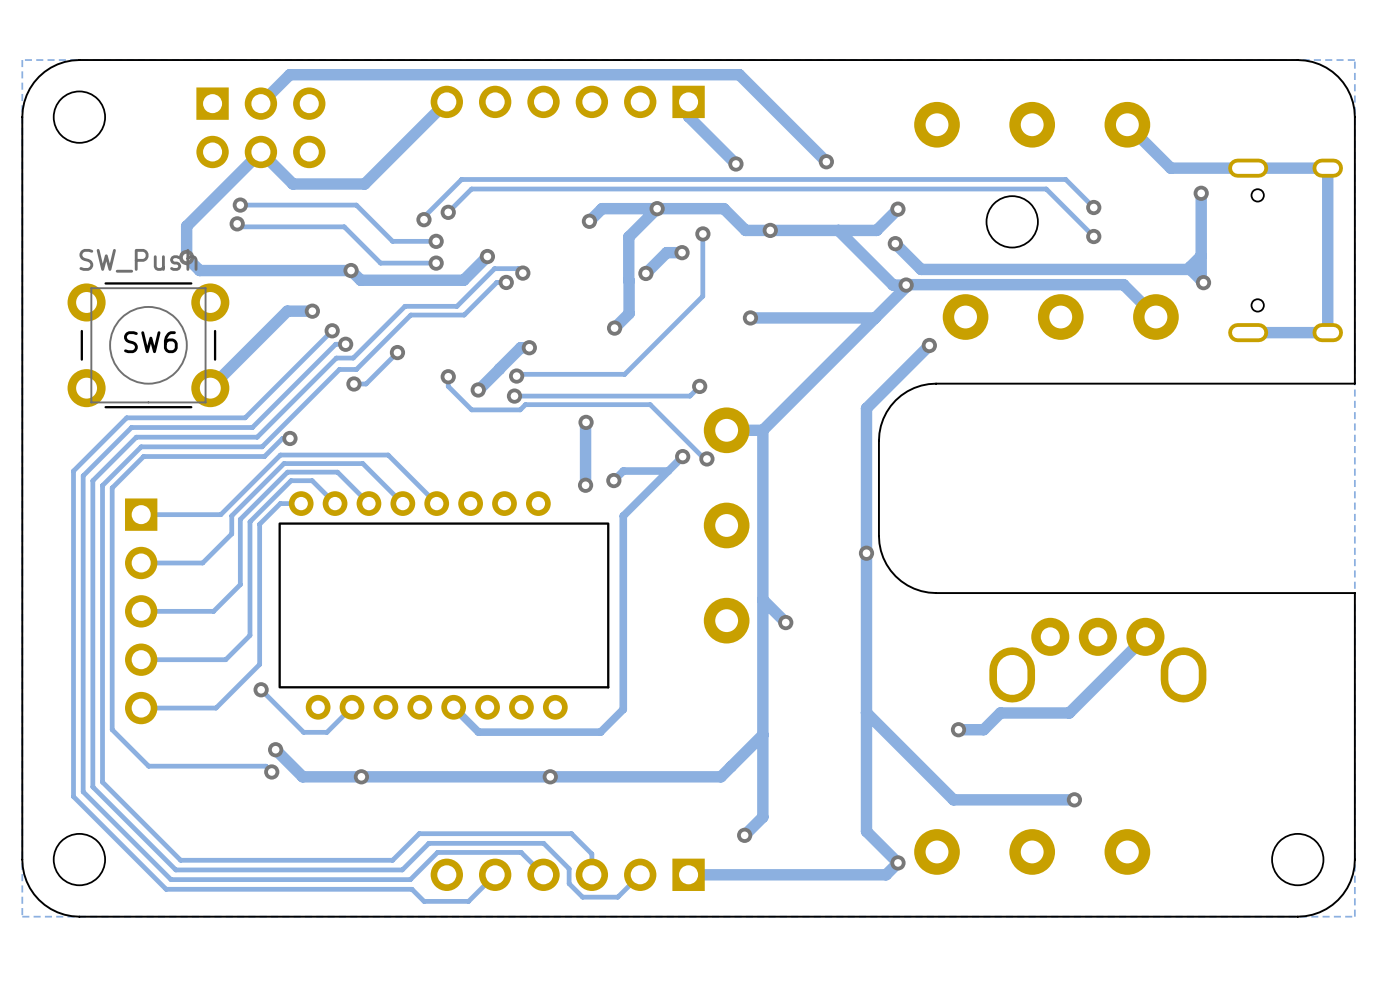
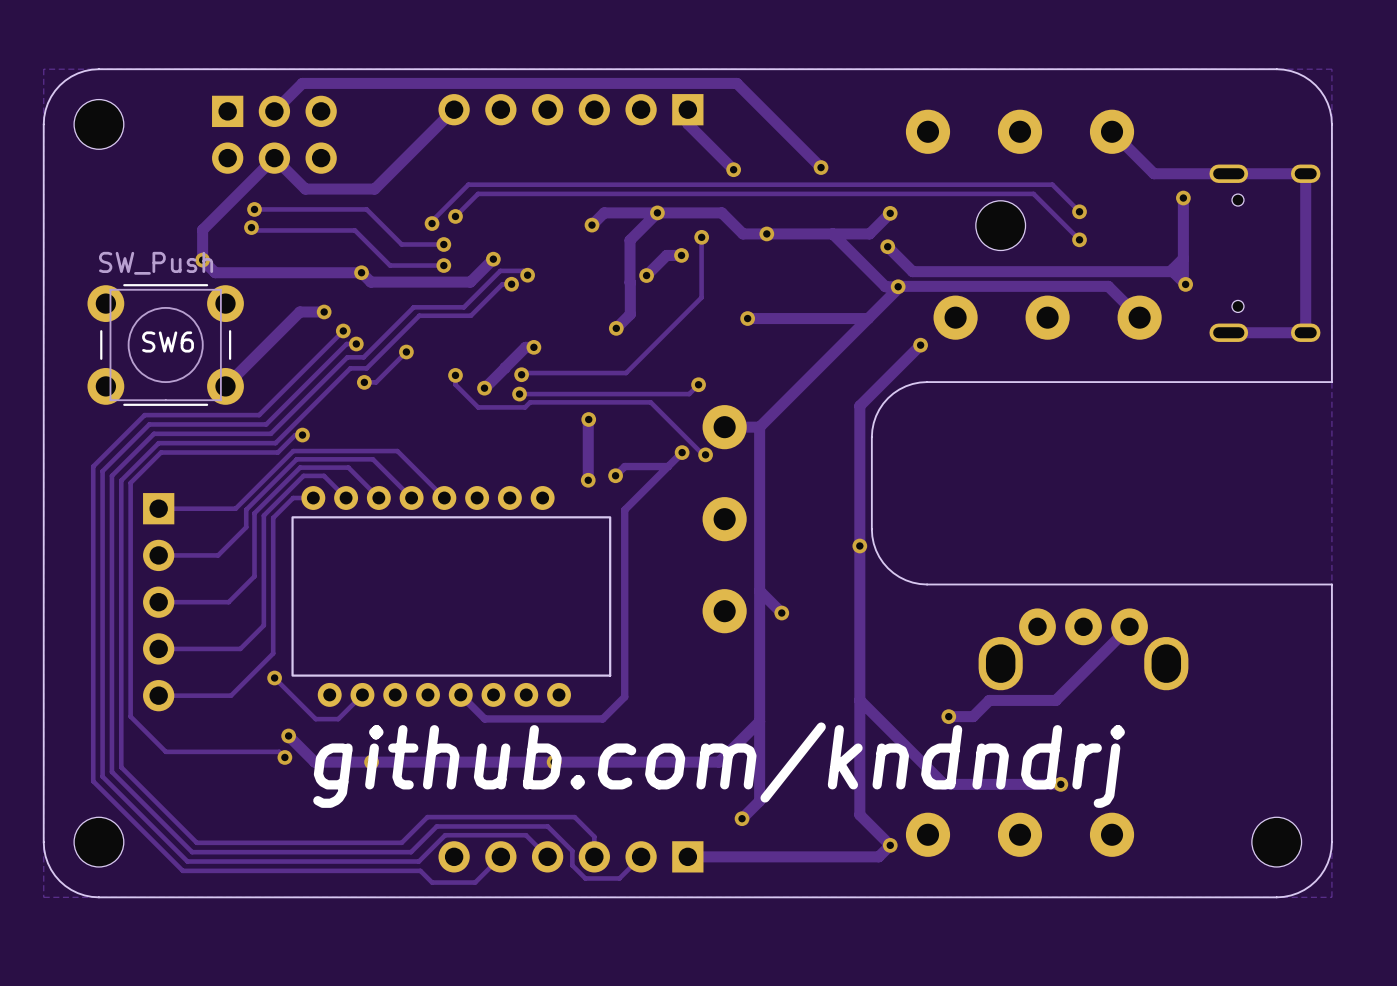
text: none -> github.com/kndndrj (719, 765)

